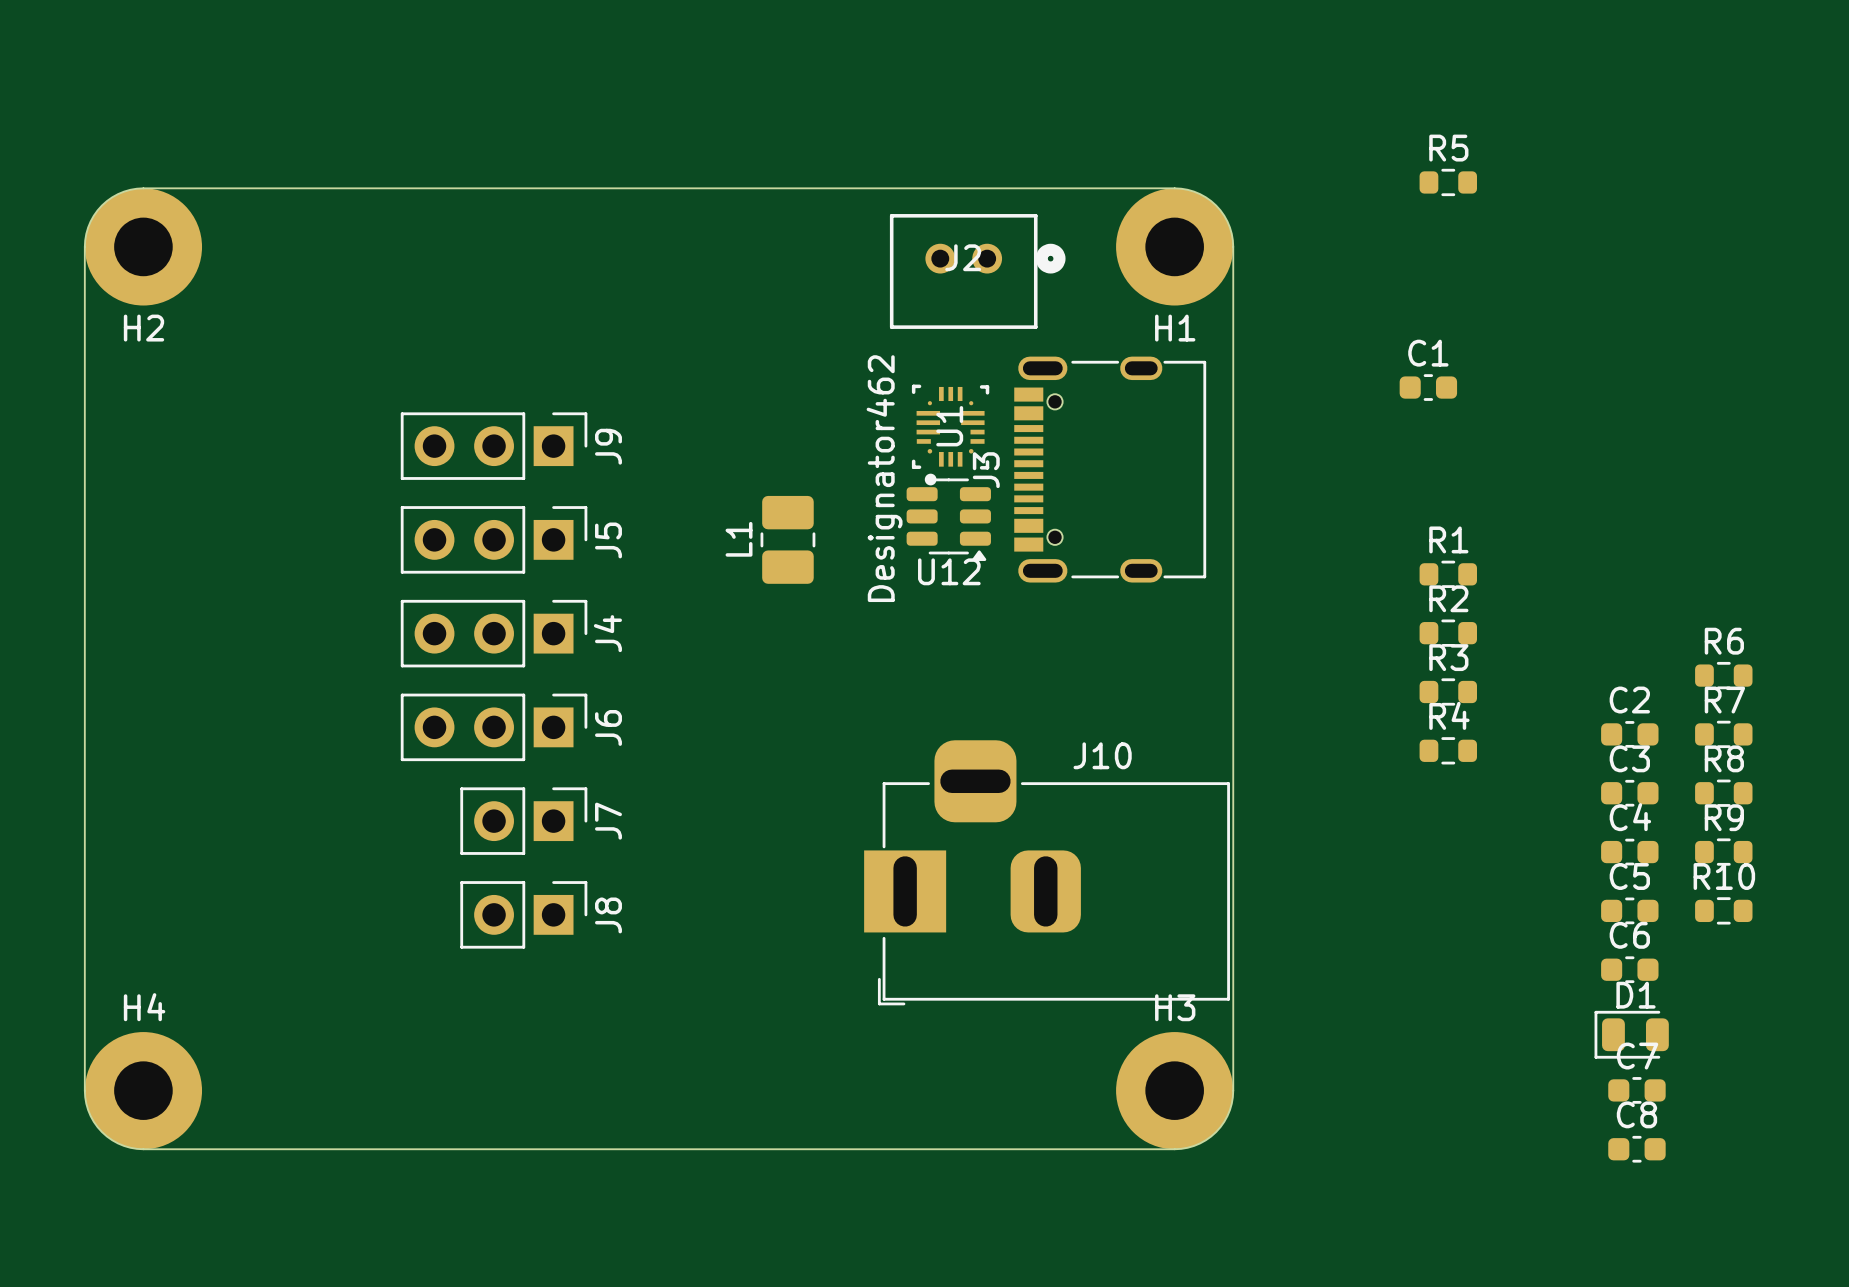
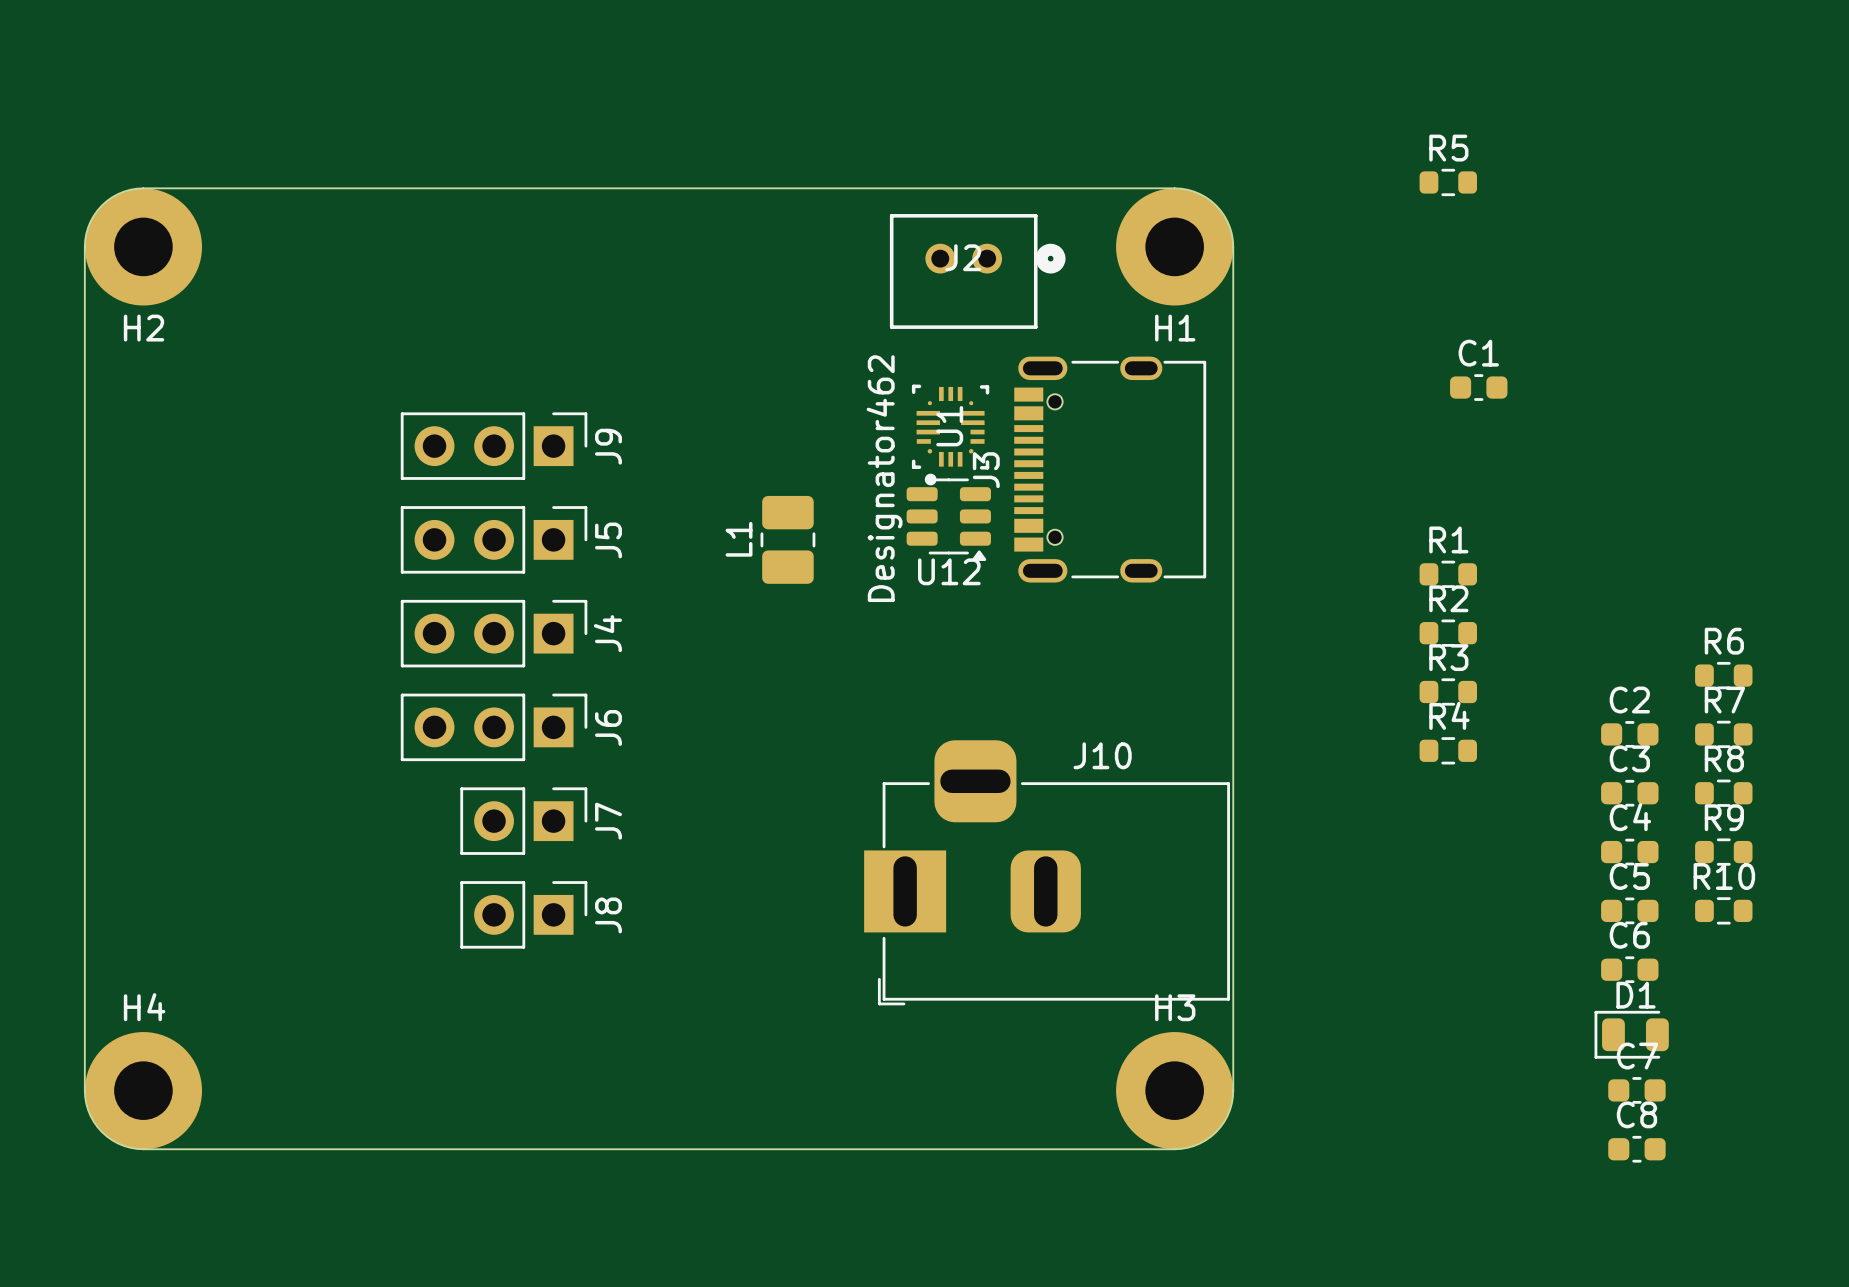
C1 position: (1428, 387) -> (1478, 387)

